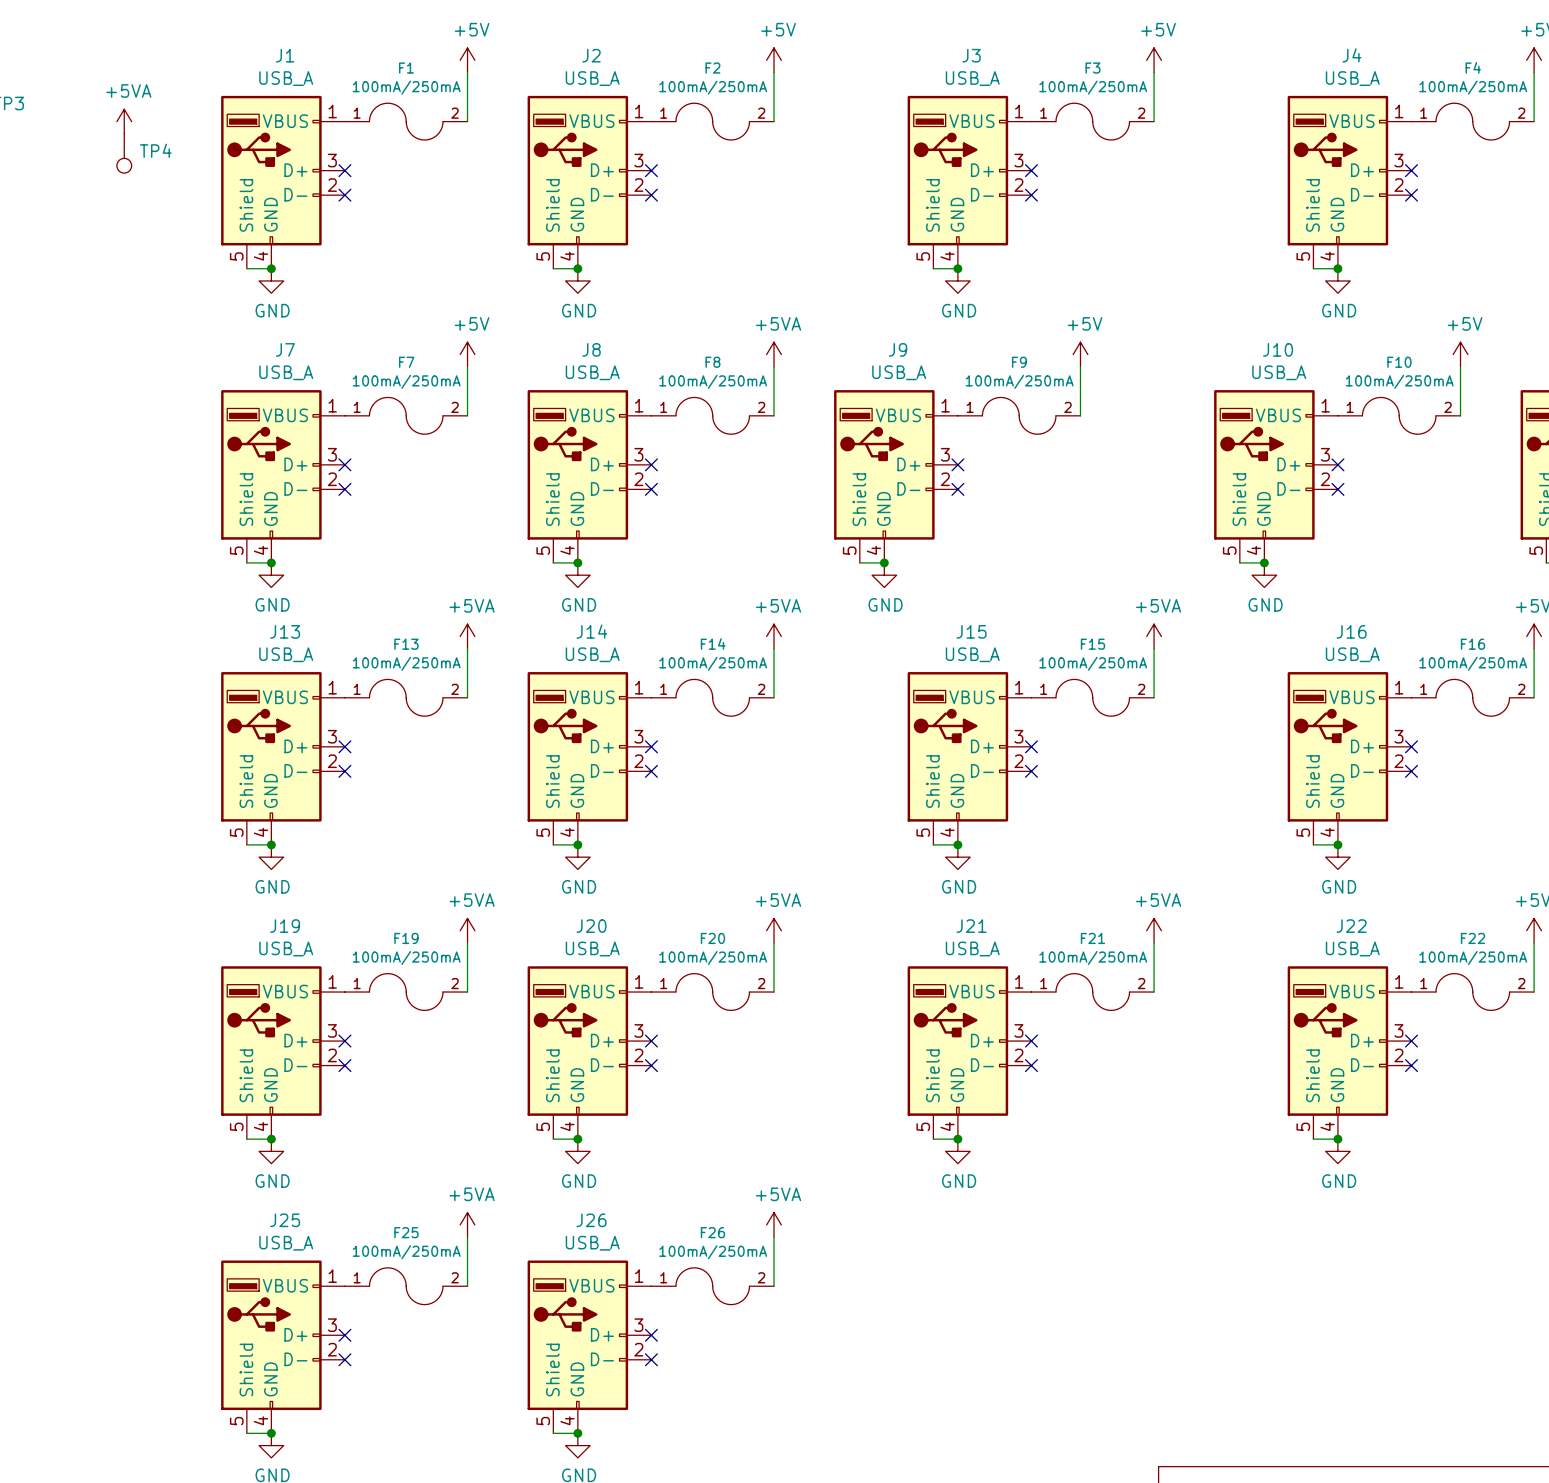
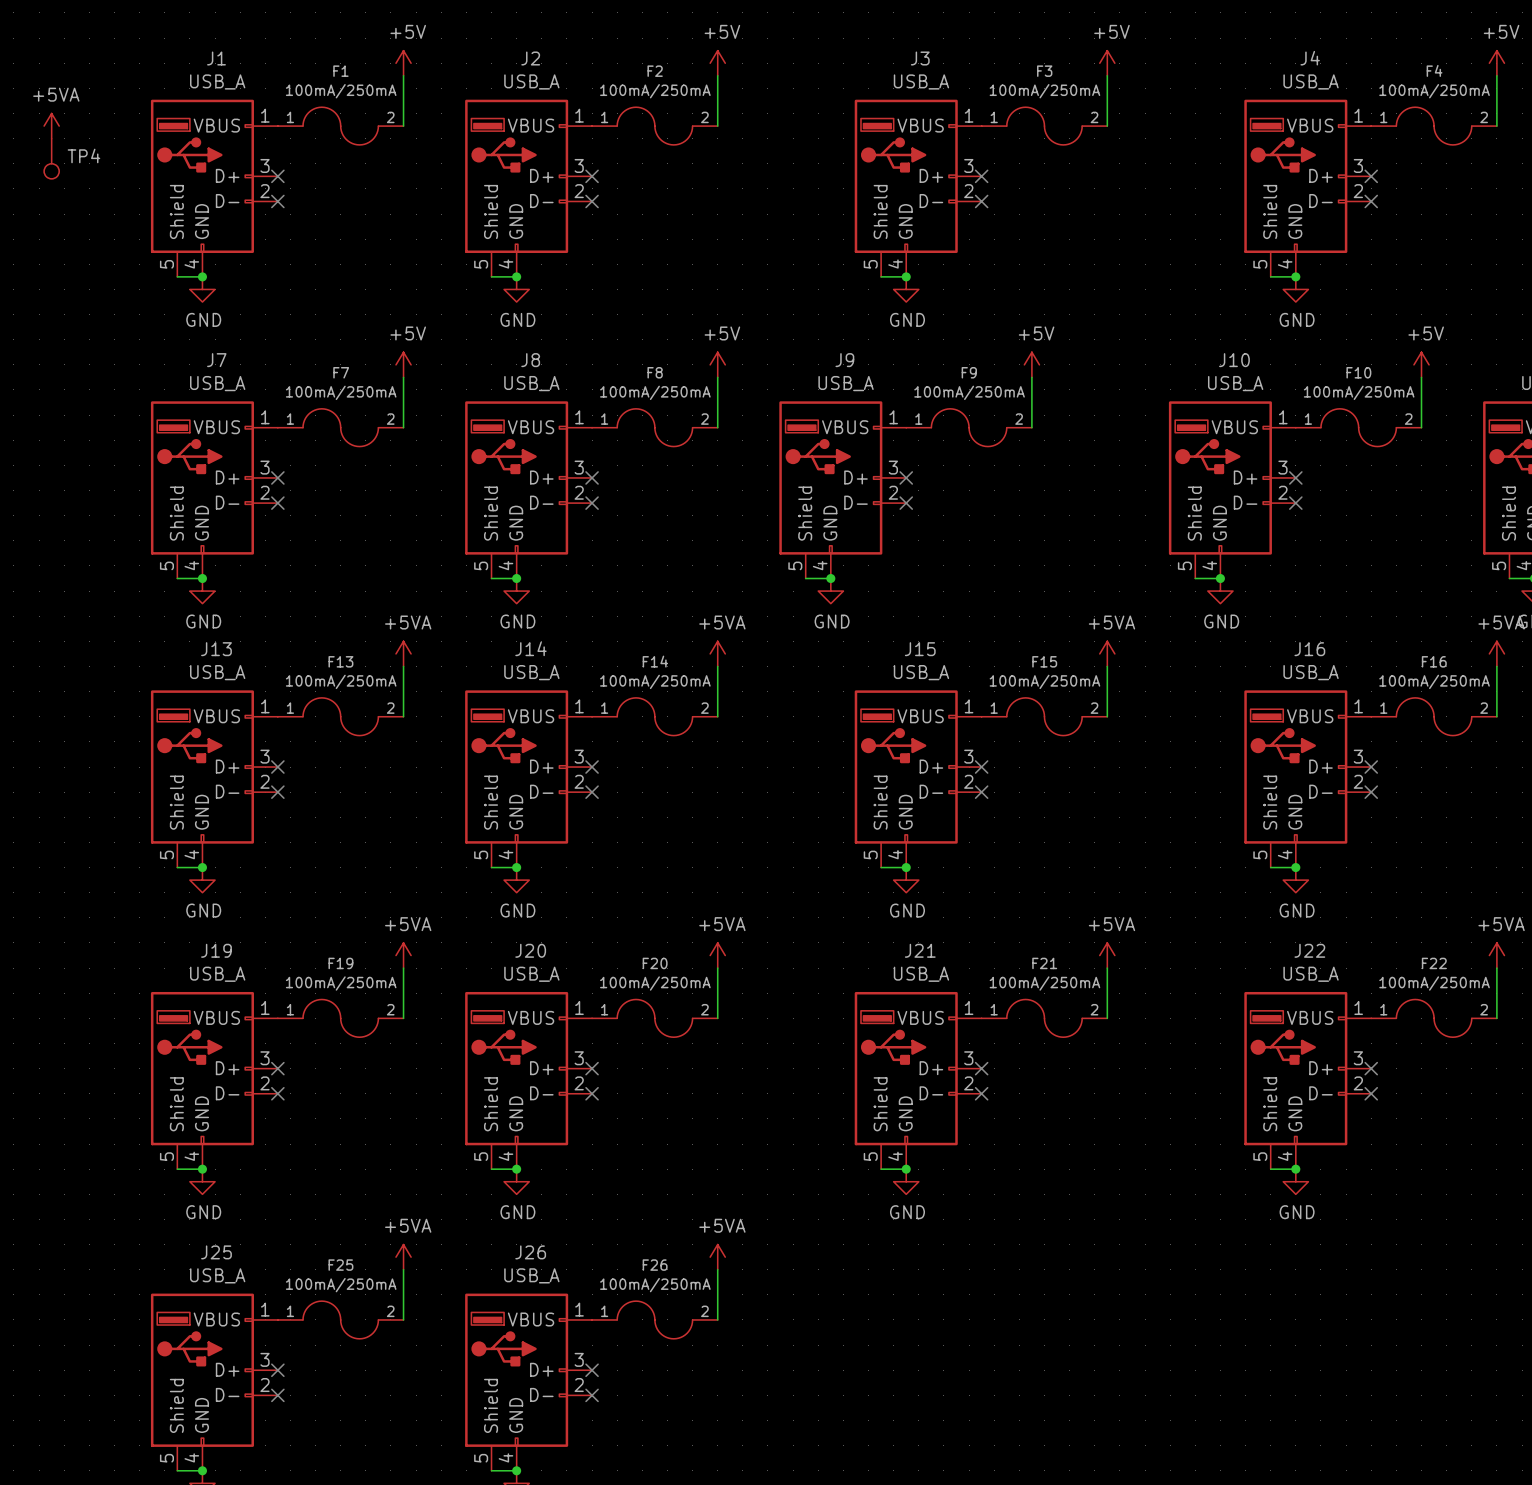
power symbol: +5VA (774, 354) -> +5V (717, 364)

